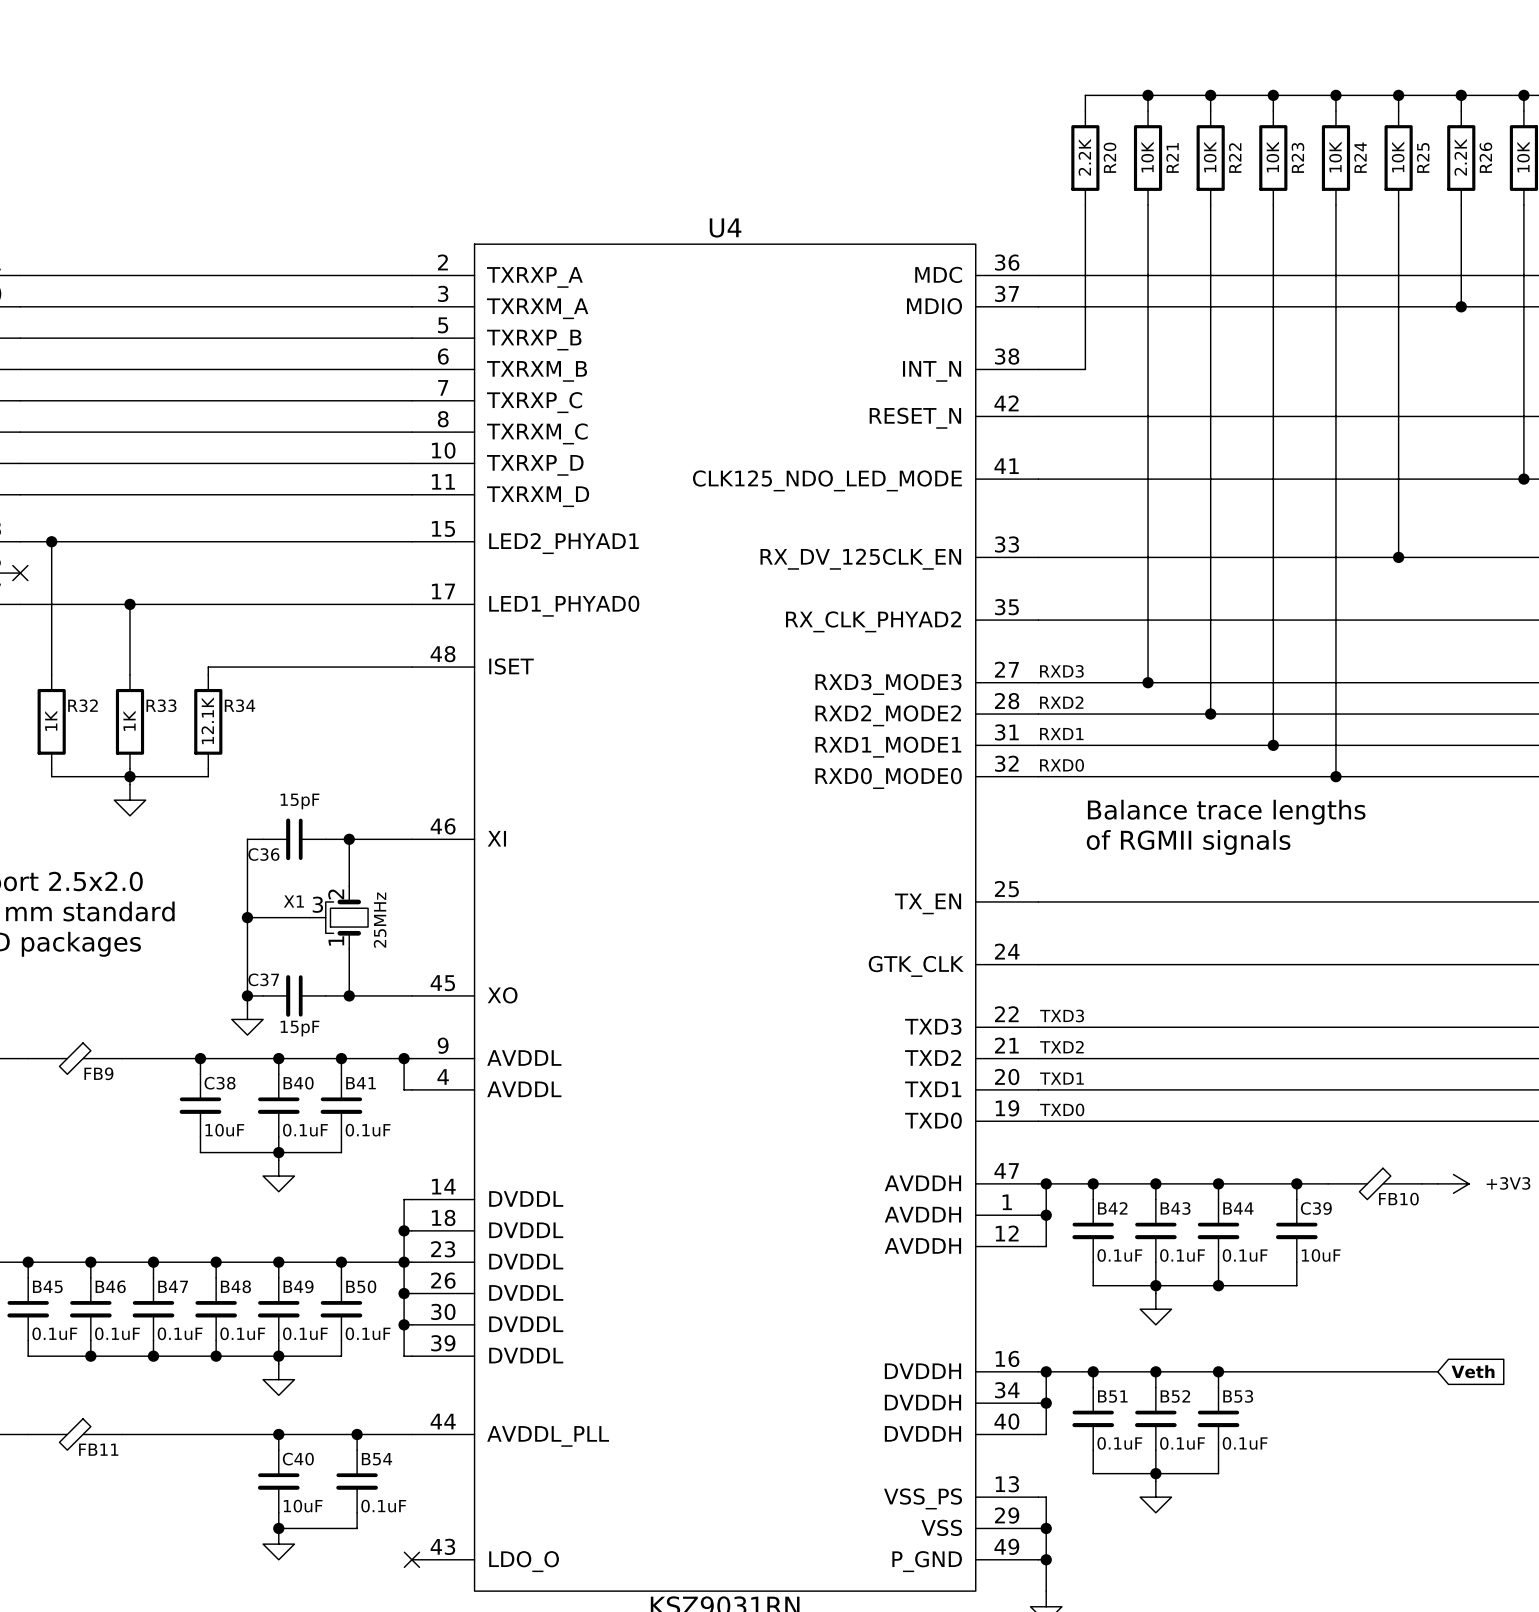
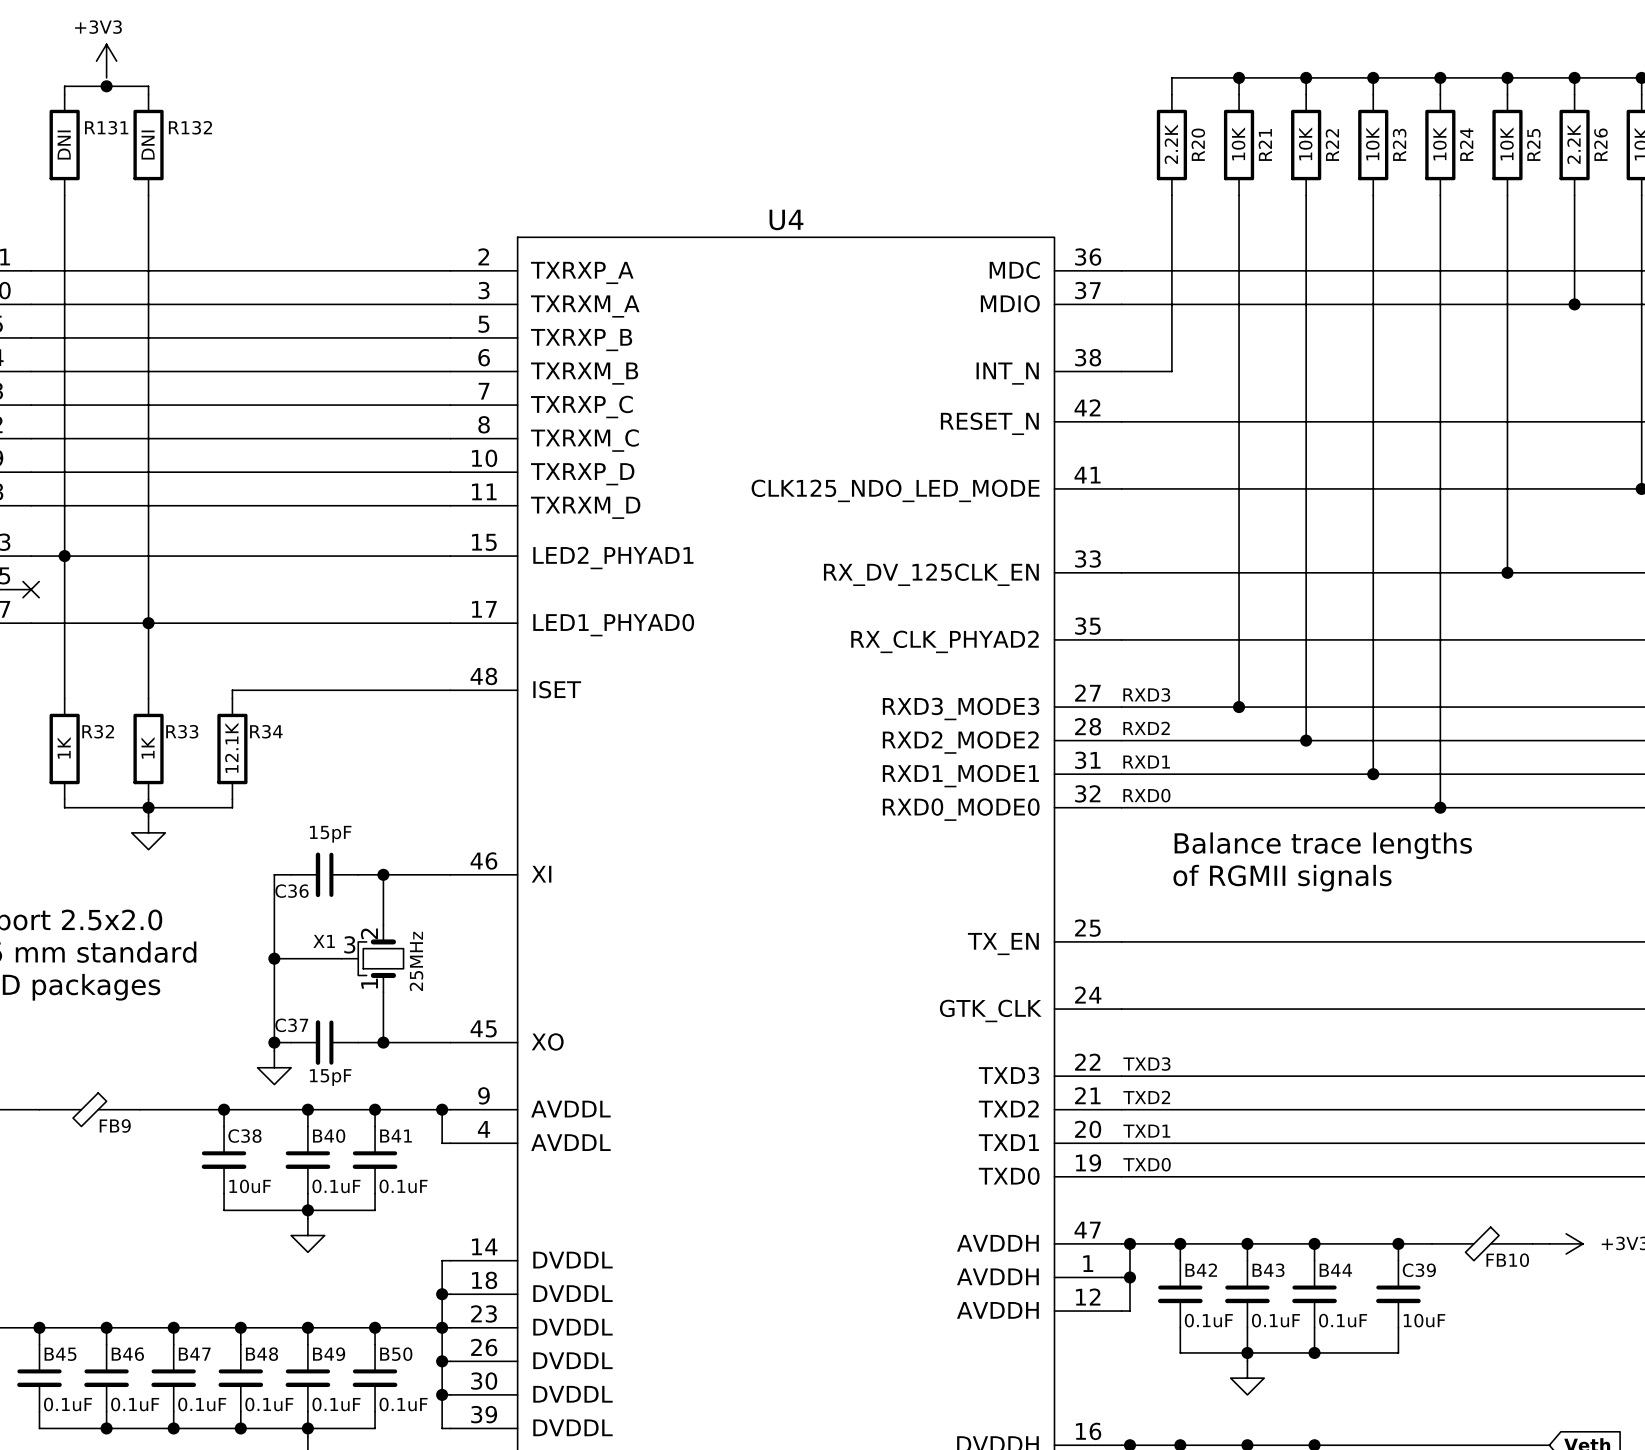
power symbol: none -> +3V3 (106, 61)
junction: none -> (106, 86)
wire: none -> (64, 94) (64, 86) (148, 86) (148, 94)
R131: none -> DNI (64, 145)
R132: none -> DNI (148, 145)
wire: none -> (64, 195) (64, 556)
wire: none -> (148, 195) (148, 623)

